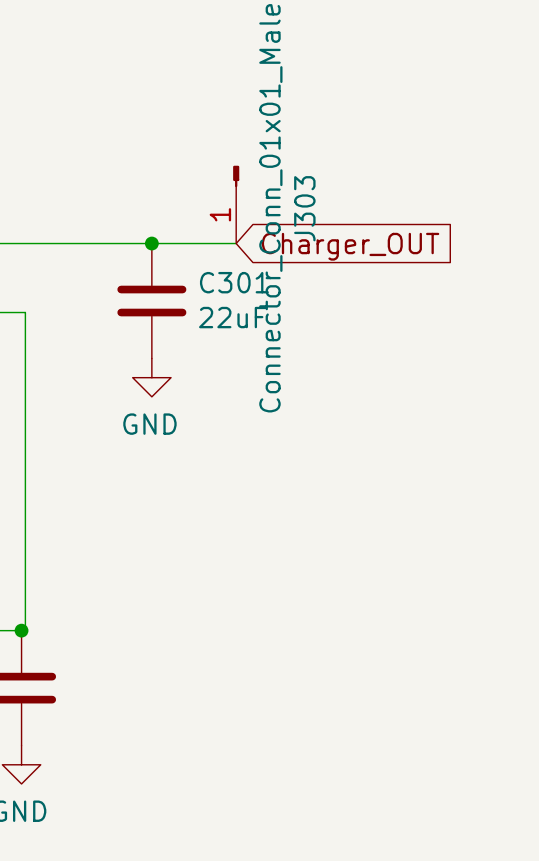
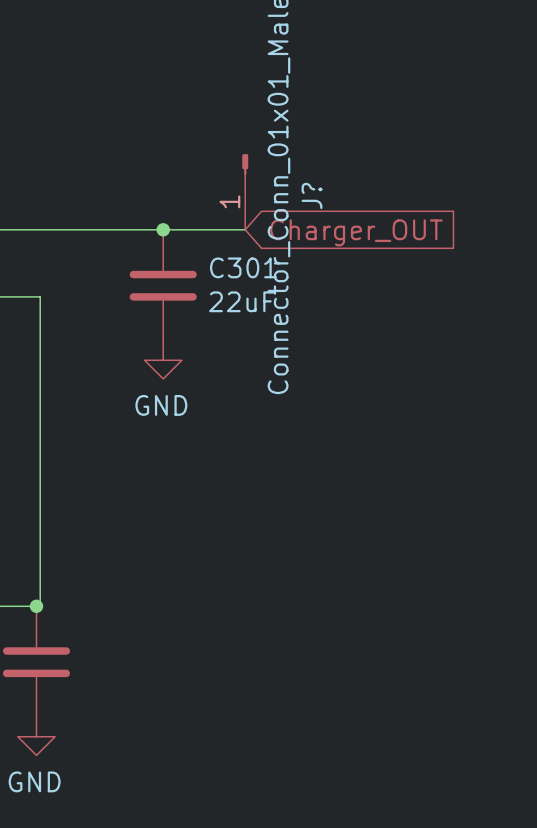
J303 name: J303 (304, 208) -> J? (312, 195)

